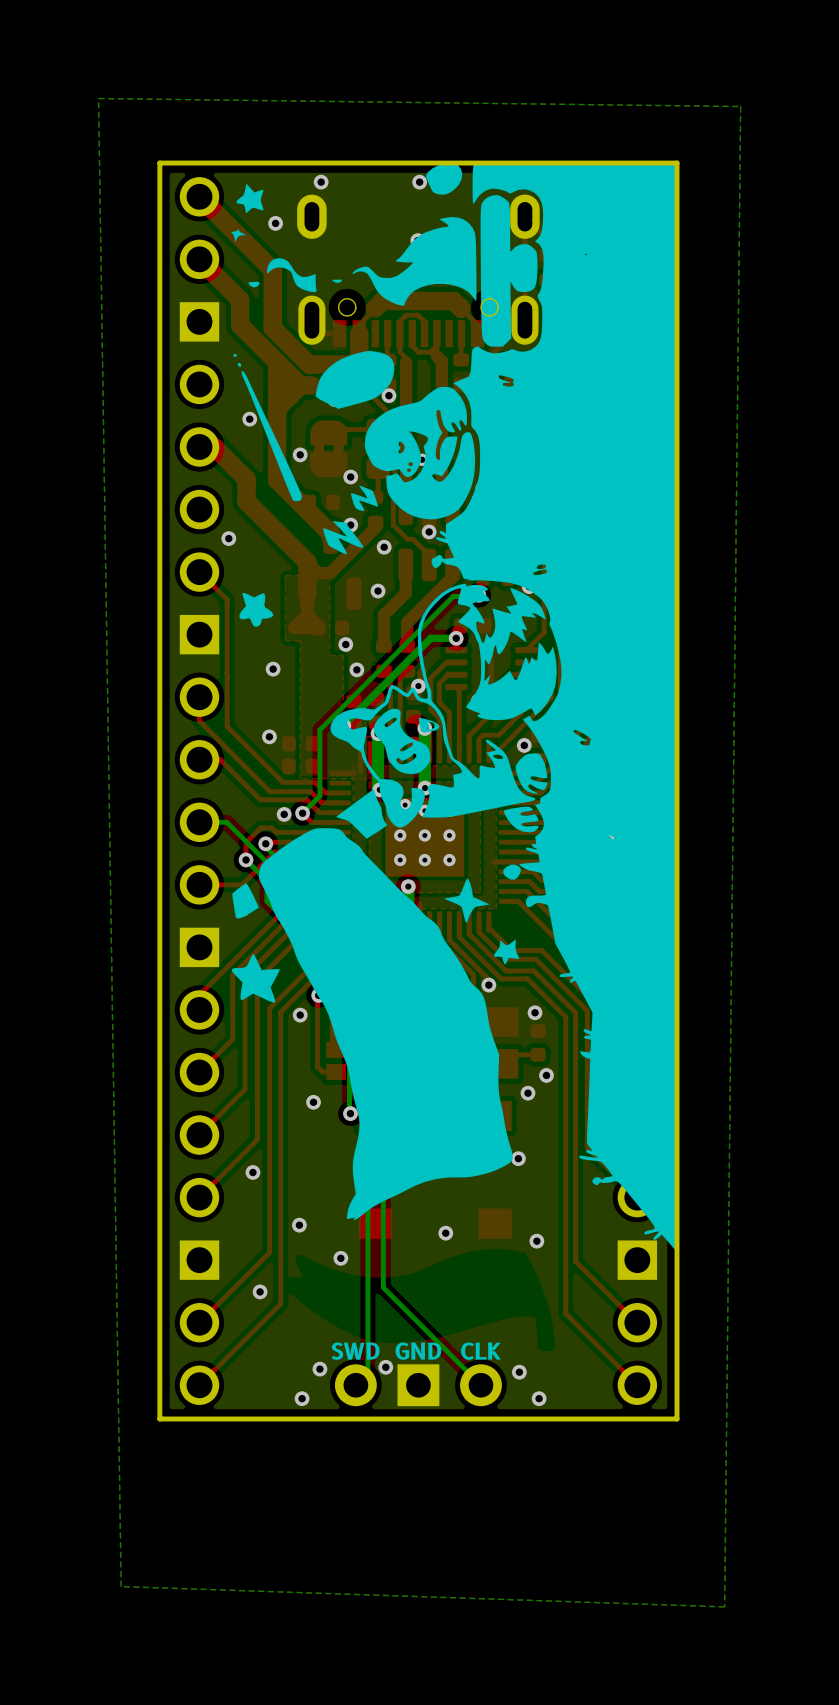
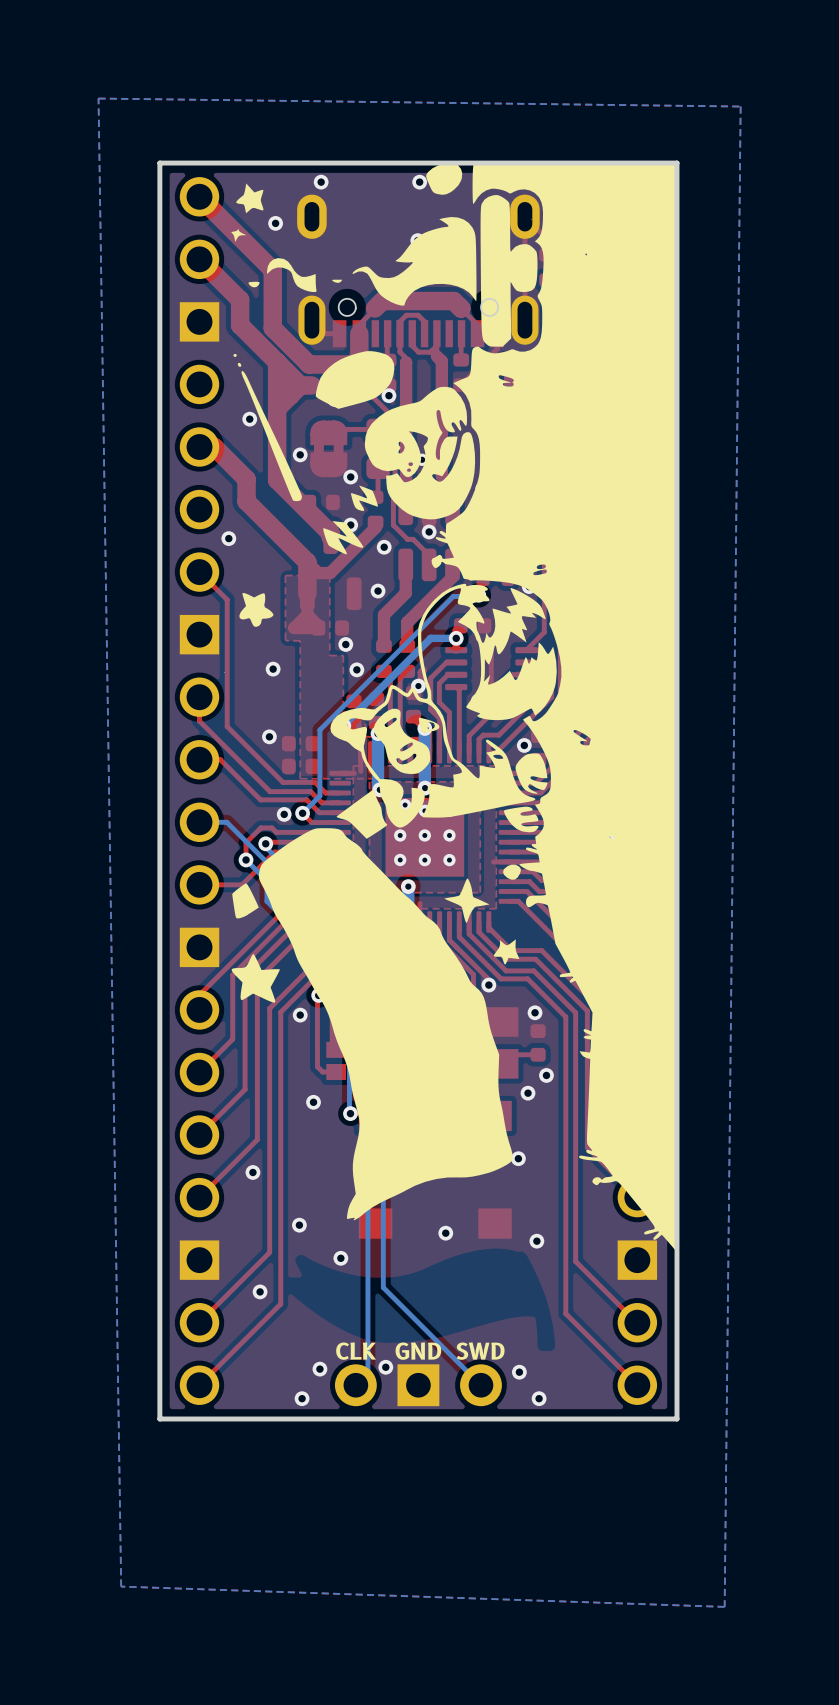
text: SWD (355, 1351) -> CLK (356, 1351)
text: CLK (481, 1351) -> SWD (480, 1351)

